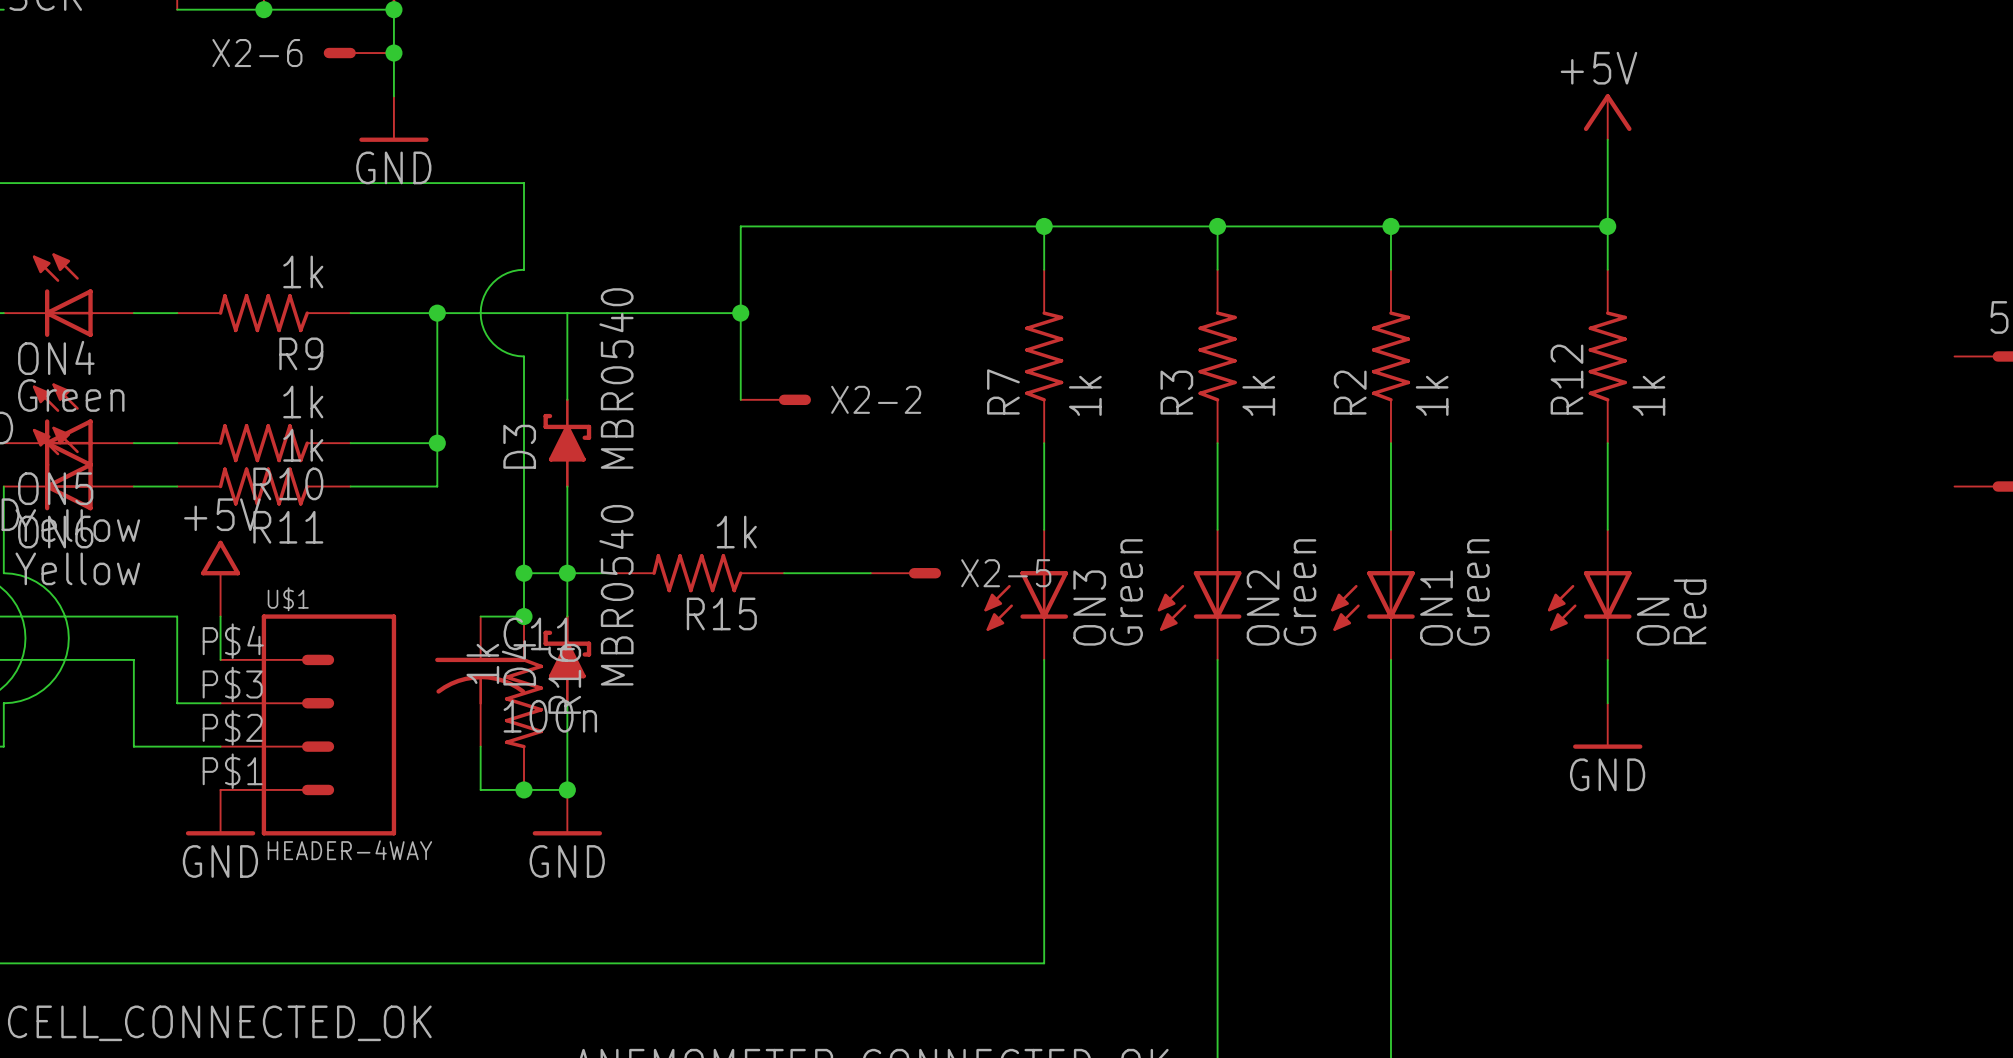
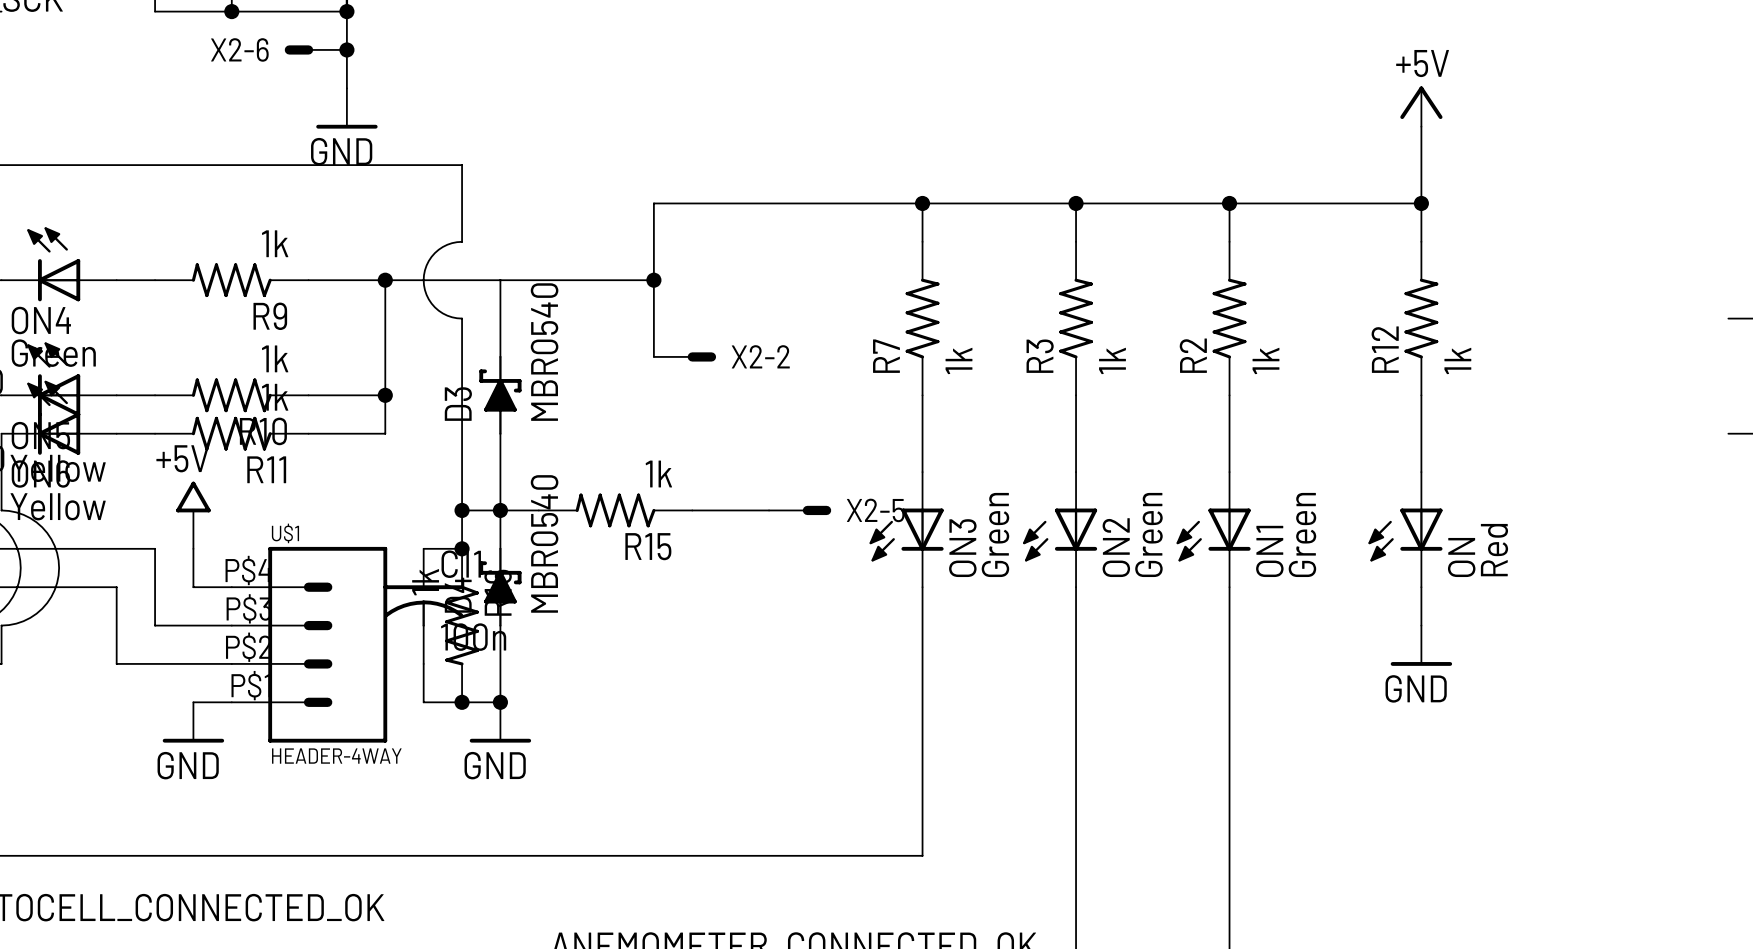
U$1 position: (308, 724) -> (309, 644)

